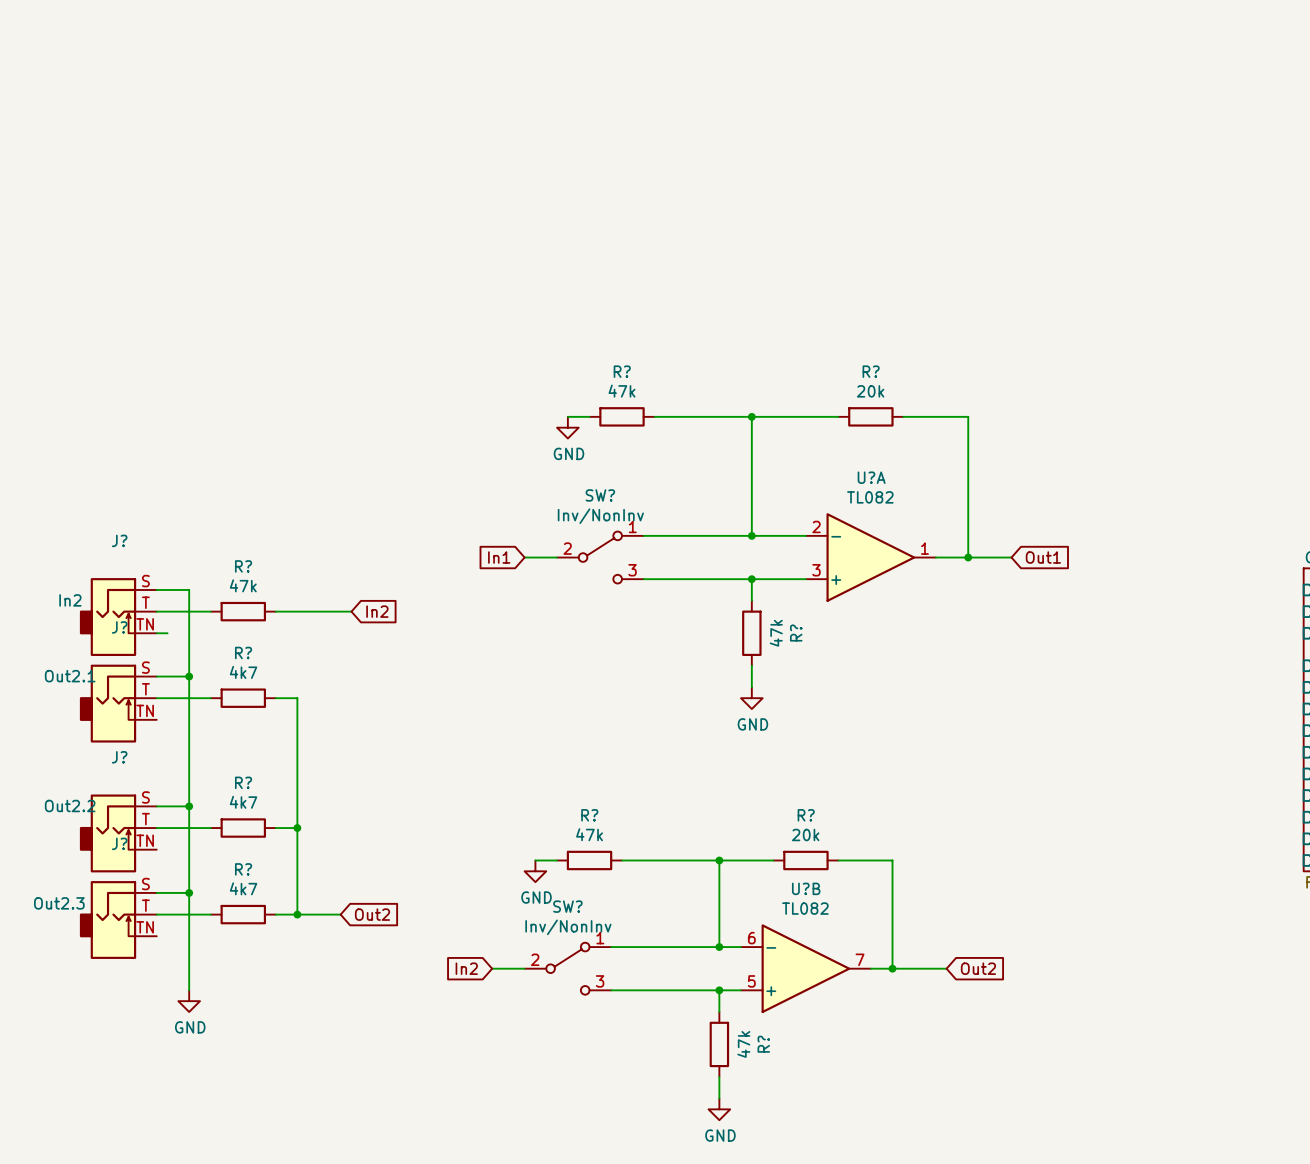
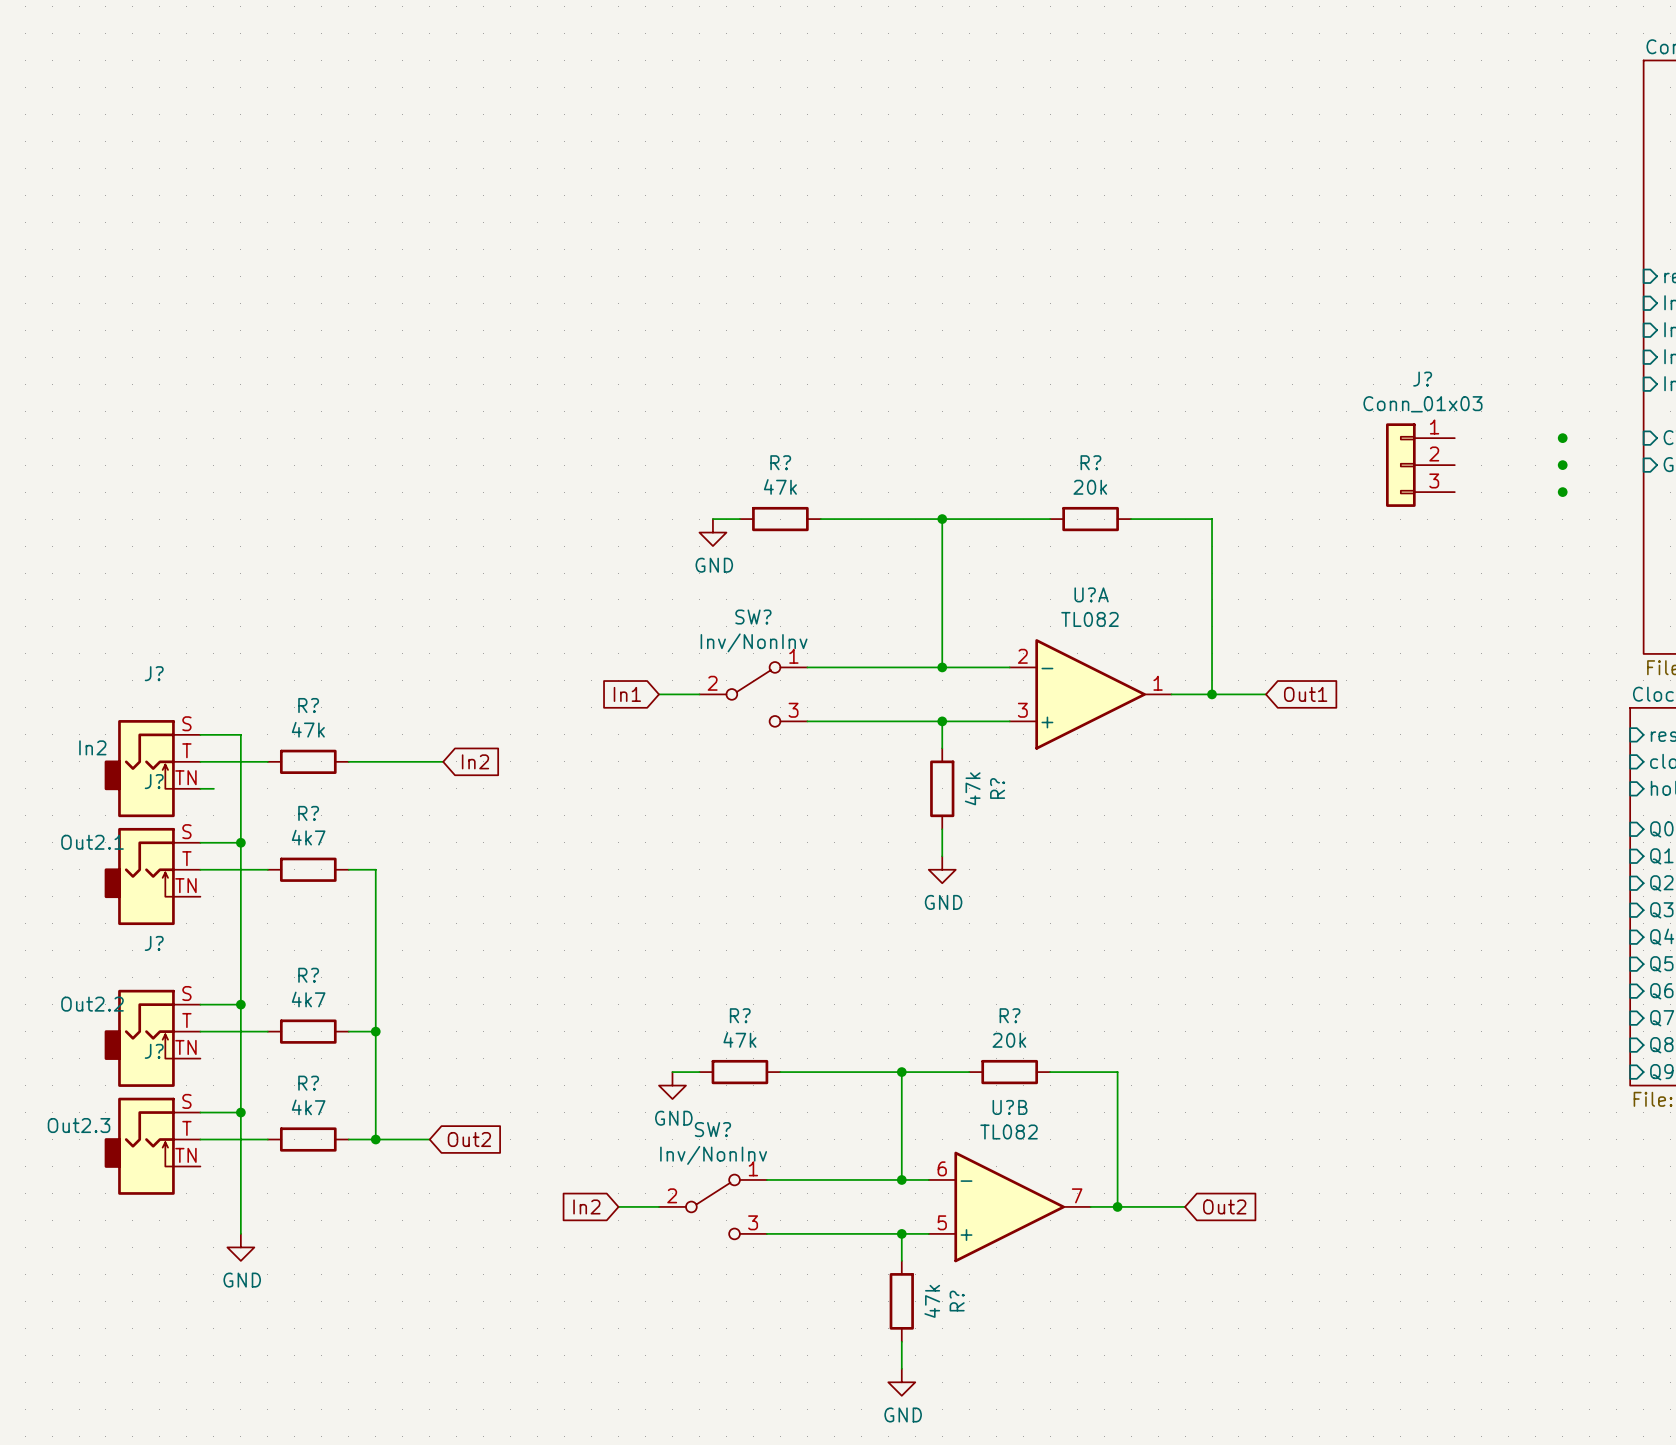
junction: none -> (1562, 438)
J?: none -> Conn_01x03 (1420, 465)
junction: none -> (1562, 465)
junction: none -> (1562, 492)

